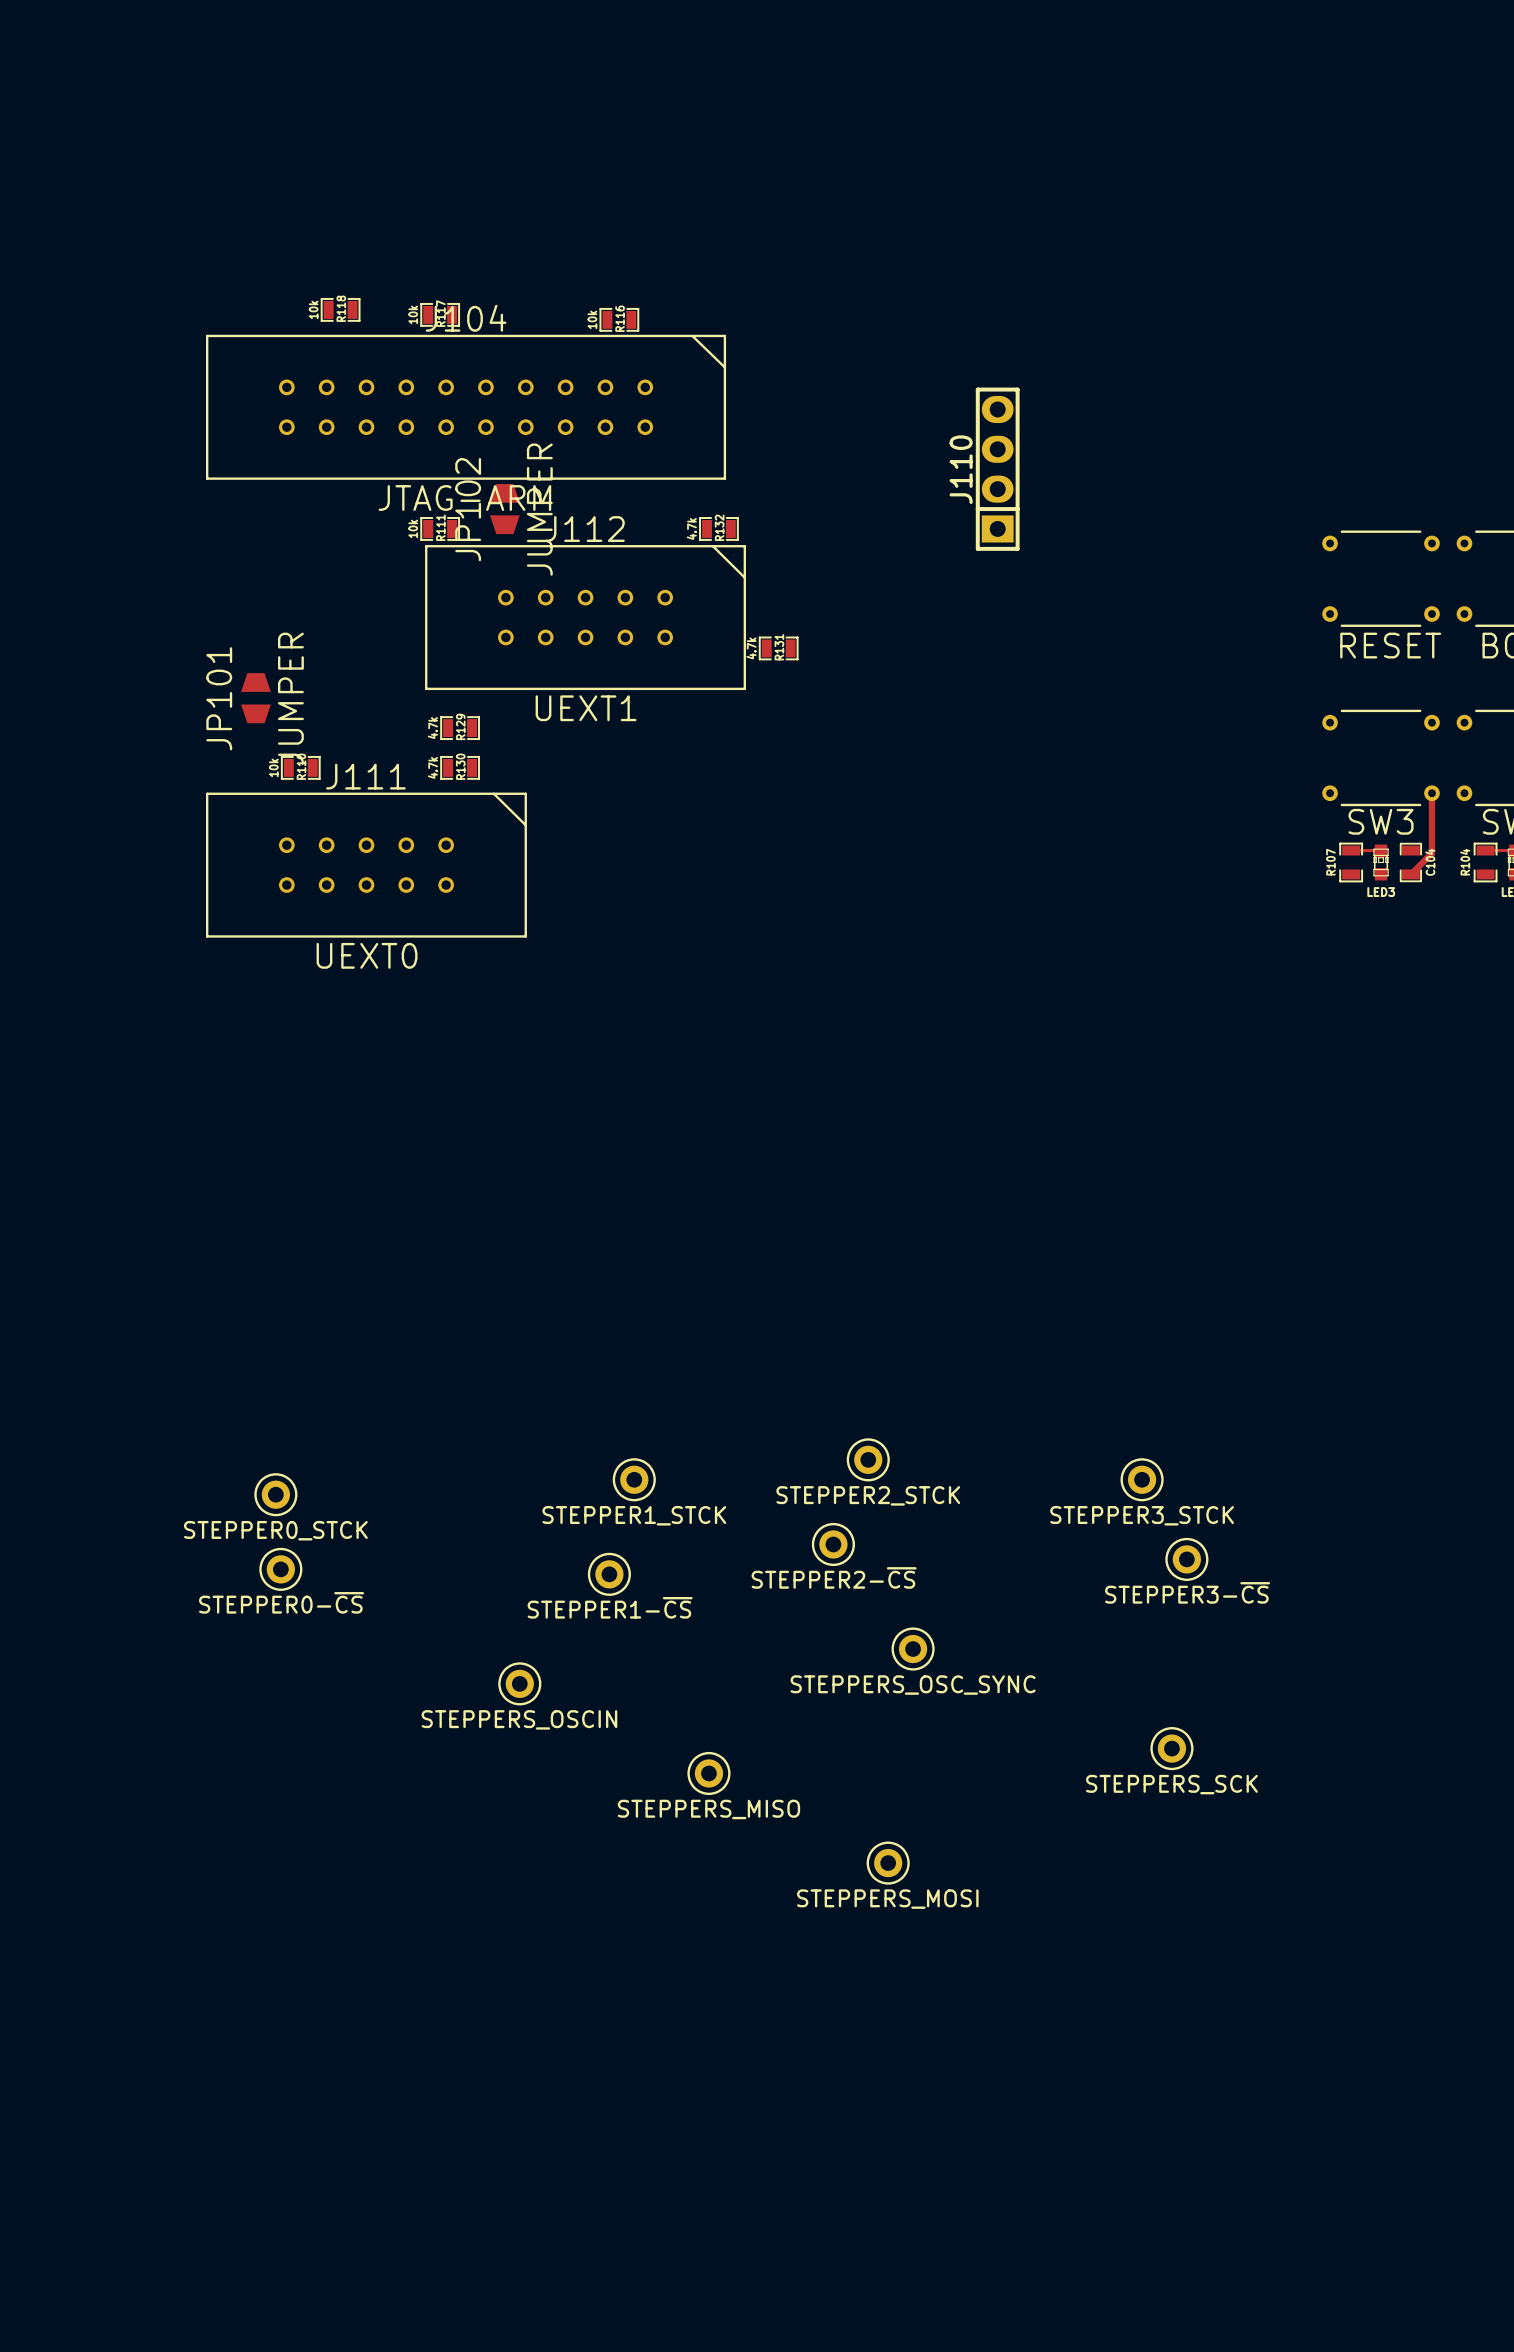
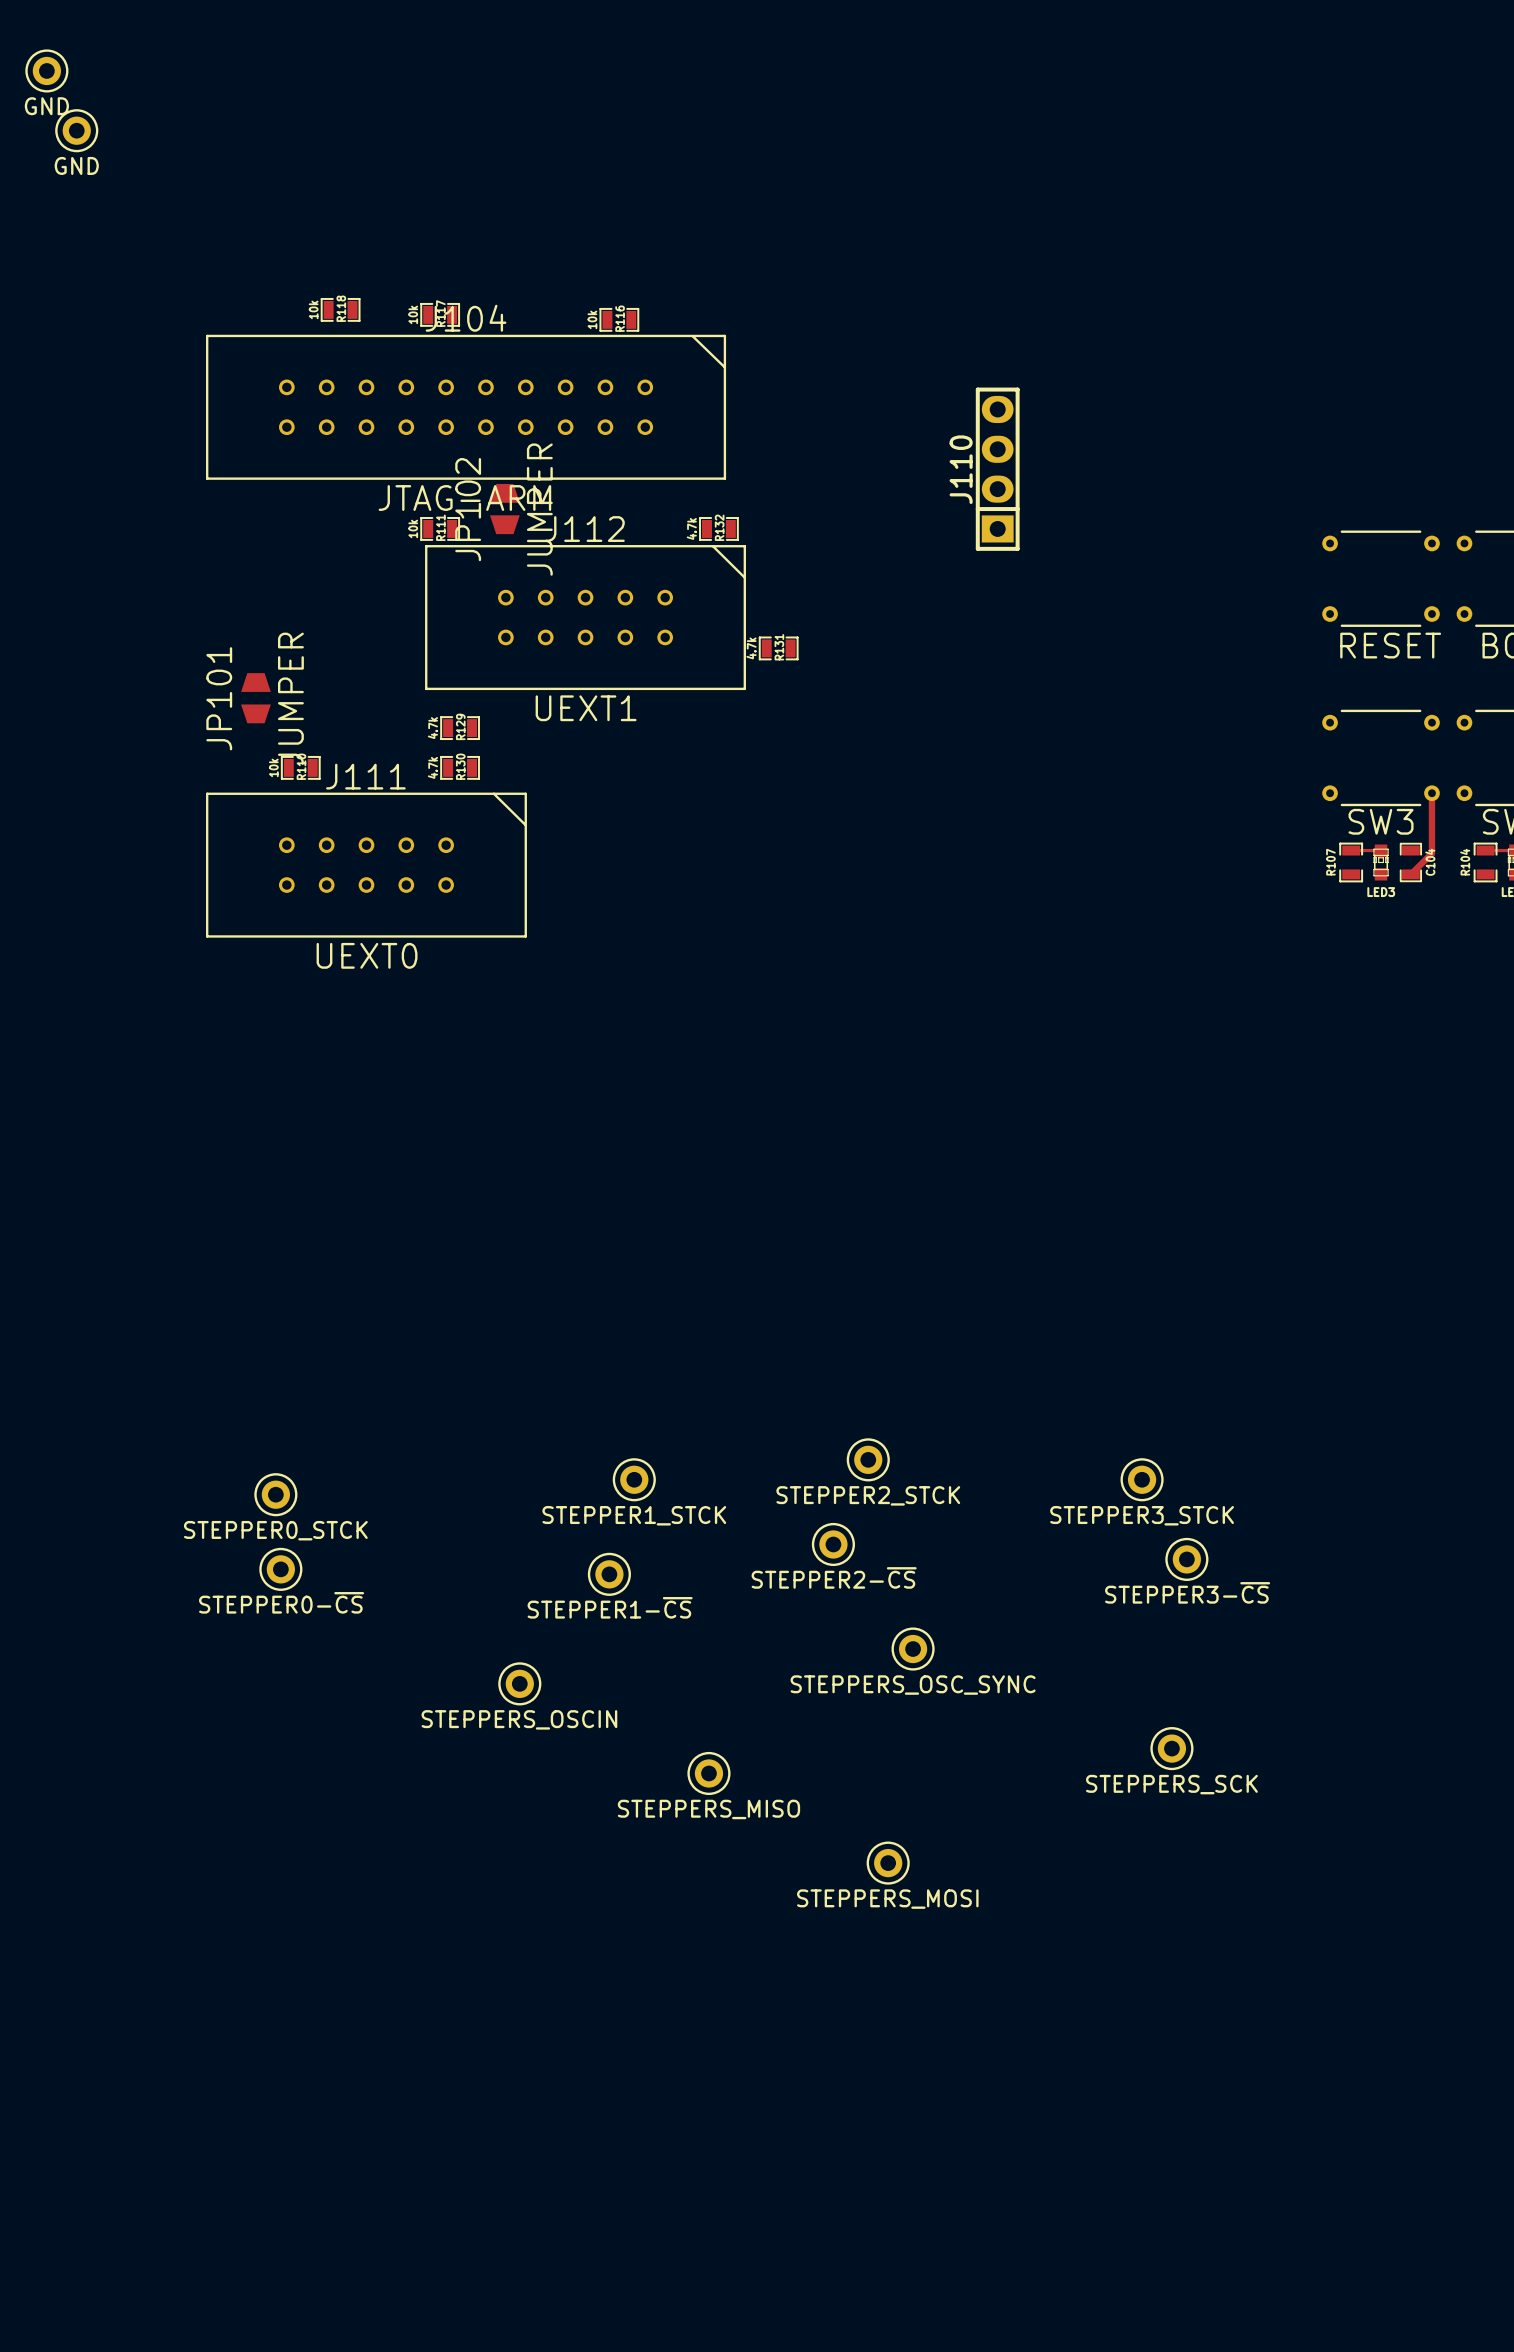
part: none -> GND (46, 70)
part: none -> GND (76, 130)

